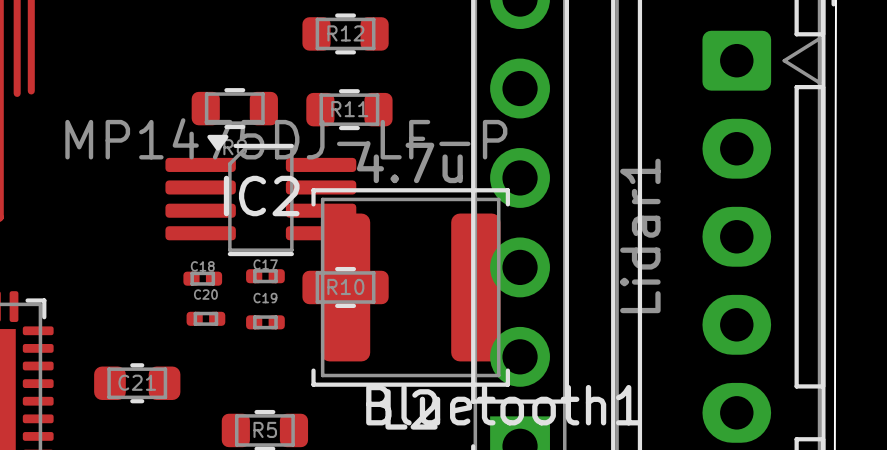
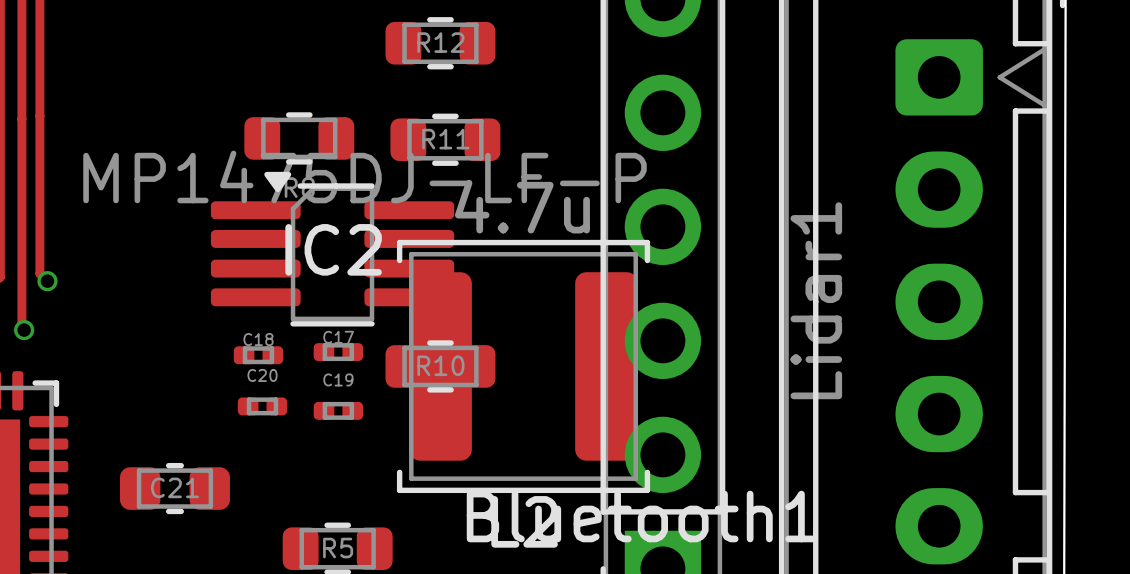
track: none -> (39, 115) (39, 273) (47, 281)
track: none -> (21, 119) (21, 327) (24, 330)
via: none -> (47, 281)
via: none -> (24, 330)

